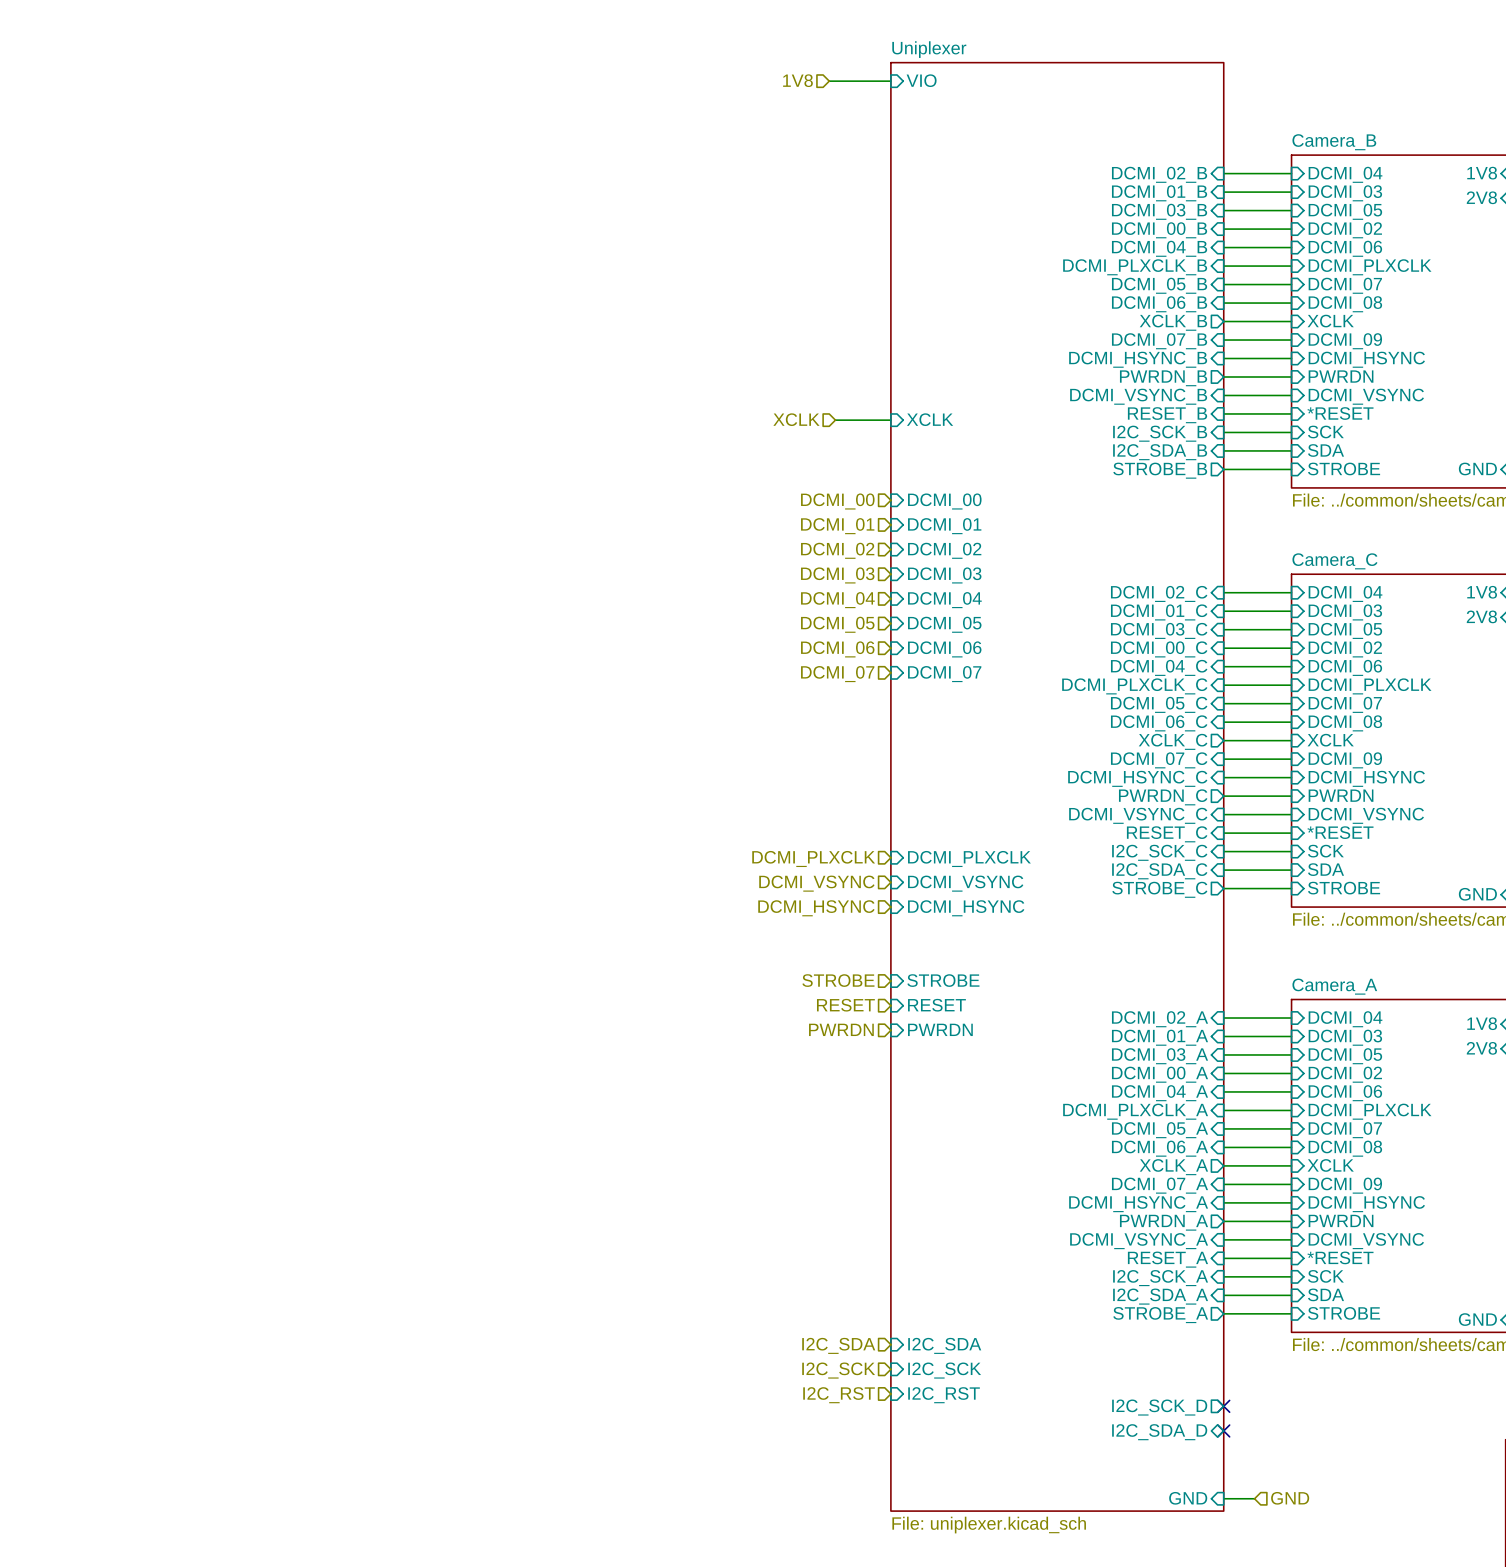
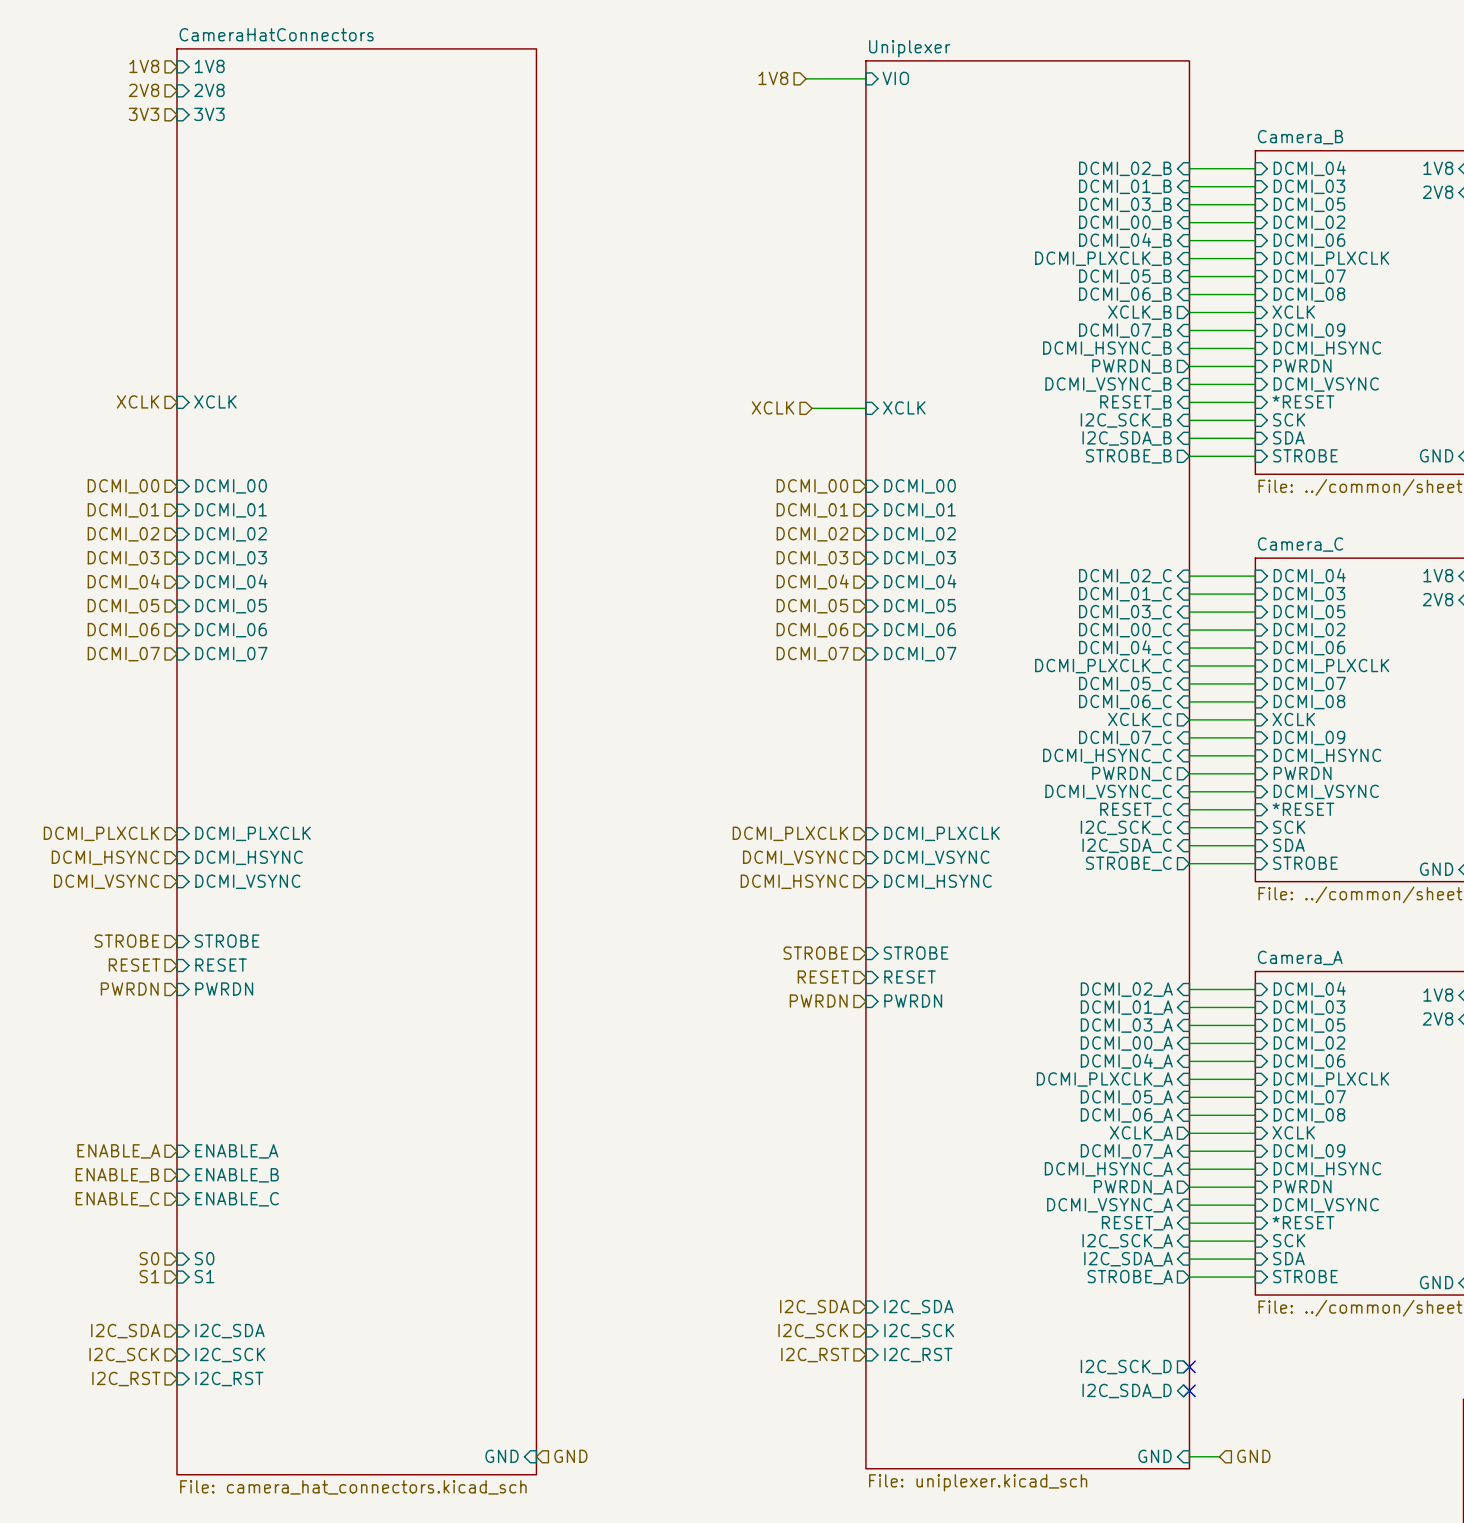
hierarchical label: none -> 1V8 (144, 66)
sheet pin: none -> 1V8 (209, 66)
hierarchical label: none -> 2V8 (144, 90)
sheet pin: none -> 2V8 (209, 90)
hierarchical label: none -> 3V3 (144, 114)
sheet pin: none -> 3V3 (209, 114)
hierarchical label: none -> XCLK (138, 401)
sheet pin: none -> XCLK (215, 401)
hierarchical label: none -> DCMI_00 (123, 486)
sheet pin: none -> DCMI_00 (231, 486)
hierarchical label: none -> DCMI_01 (123, 510)
sheet pin: none -> DCMI_01 (231, 510)
hierarchical label: none -> DCMI_02 (123, 534)
sheet pin: none -> DCMI_02 (231, 534)
hierarchical label: none -> DCMI_03 (123, 558)
sheet pin: none -> DCMI_03 (231, 558)
hierarchical label: none -> DCMI_04 (123, 581)
sheet pin: none -> DCMI_04 (231, 581)
hierarchical label: none -> DCMI_05 (123, 606)
sheet pin: none -> DCMI_05 (231, 606)
hierarchical label: none -> DCMI_06 (123, 630)
sheet pin: none -> DCMI_06 (231, 630)
hierarchical label: none -> DCMI_07 (123, 654)
sheet pin: none -> DCMI_07 (231, 654)
sheet CameraHatConnectors: none -> File: camera_hat_connectors.kicad_sch (356, 761)
hierarchical label: none -> DCMI_PLXCLK (101, 833)
sheet pin: none -> DCMI_PLXCLK (253, 833)
hierarchical label: none -> DCMI_HSYNC (105, 857)
sheet pin: none -> DCMI_HSYNC (249, 857)
hierarchical label: none -> DCMI_VSYNC (106, 881)
sheet pin: none -> DCMI_VSYNC (247, 881)
hierarchical label: none -> STROBE (126, 941)
sheet pin: none -> STROBE (227, 941)
hierarchical label: none -> RESET (134, 965)
sheet pin: none -> RESET (221, 965)
hierarchical label: none -> PWRDN (129, 989)
sheet pin: none -> PWRDN (224, 989)
hierarchical label: none -> ENABLE_A (118, 1151)
sheet pin: none -> ENABLE_A (236, 1151)
hierarchical label: none -> ENABLE_B (117, 1175)
sheet pin: none -> ENABLE_B (237, 1175)
hierarchical label: none -> ENABLE_C (117, 1199)
sheet pin: none -> ENABLE_C (237, 1199)
hierarchical label: none -> S0 (149, 1258)
sheet pin: none -> S0 (204, 1258)
hierarchical label: none -> S1 (149, 1276)
sheet pin: none -> S1 (204, 1276)
hierarchical label: none -> I2C_SDA (125, 1331)
sheet pin: none -> I2C_SDA (229, 1331)
hierarchical label: none -> I2C_SCK (124, 1355)
sheet pin: none -> I2C_SCK (230, 1355)
hierarchical label: none -> I2C_RST (126, 1379)
sheet pin: none -> I2C_RST (229, 1379)
sheet pin: none -> GND (502, 1456)
hierarchical label: none -> GND (570, 1456)

